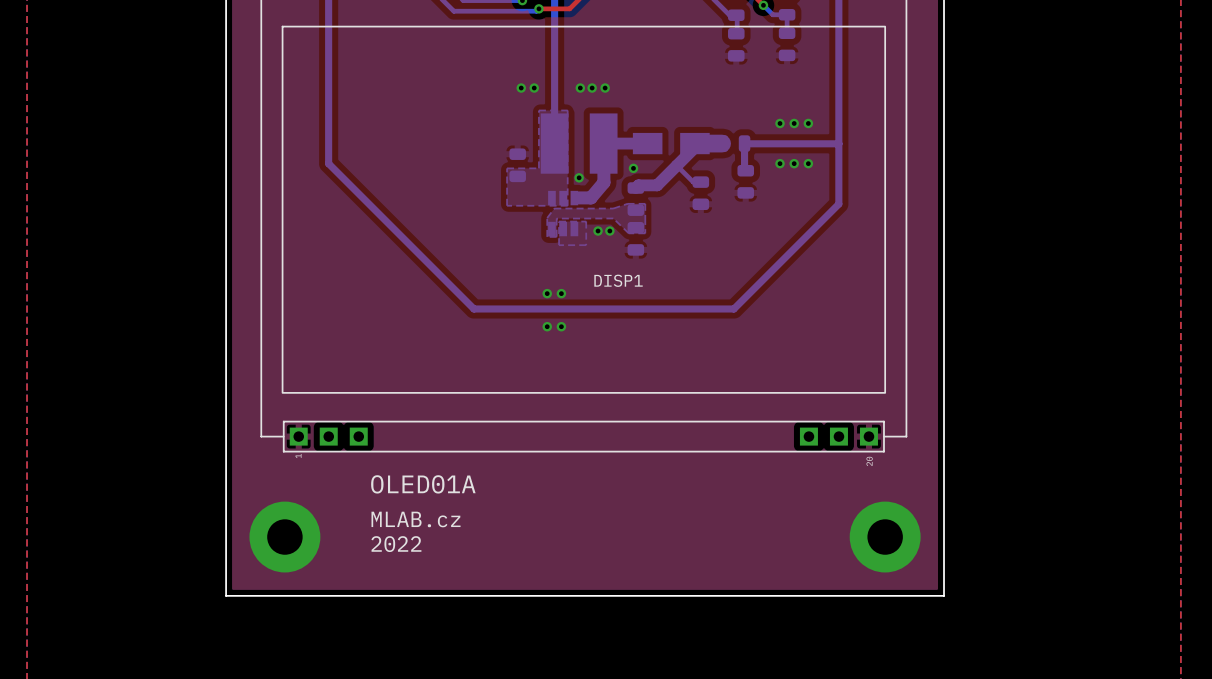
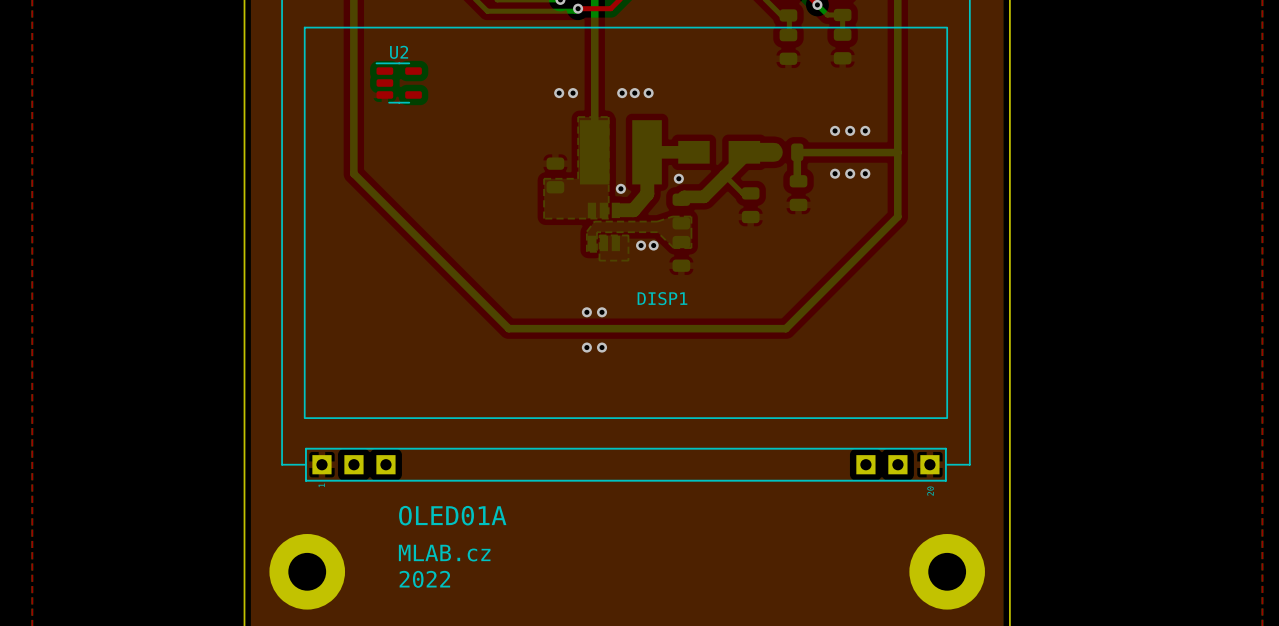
U2: none -> (398, 83)

